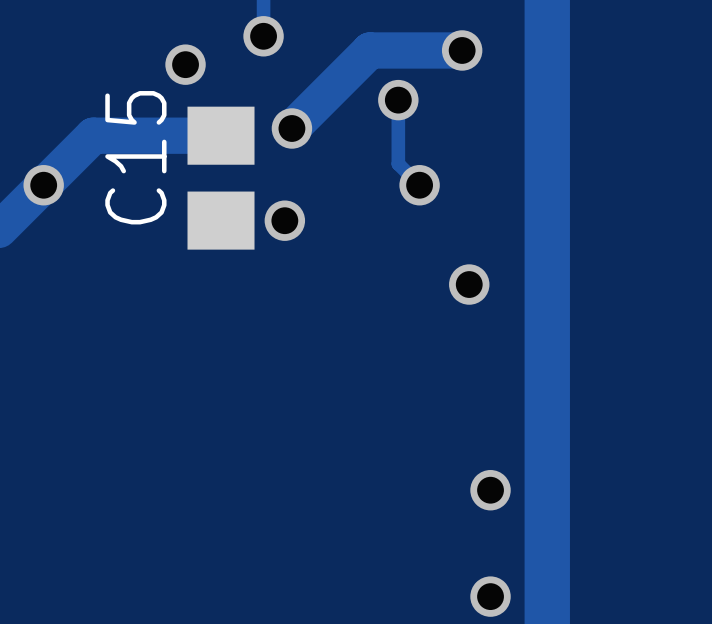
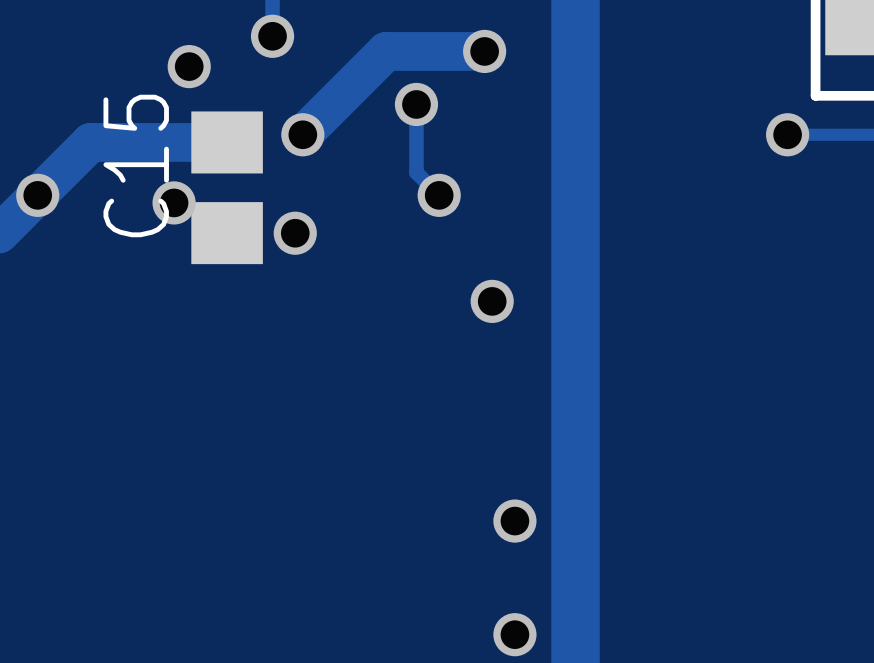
via: none -> (174, 202)

